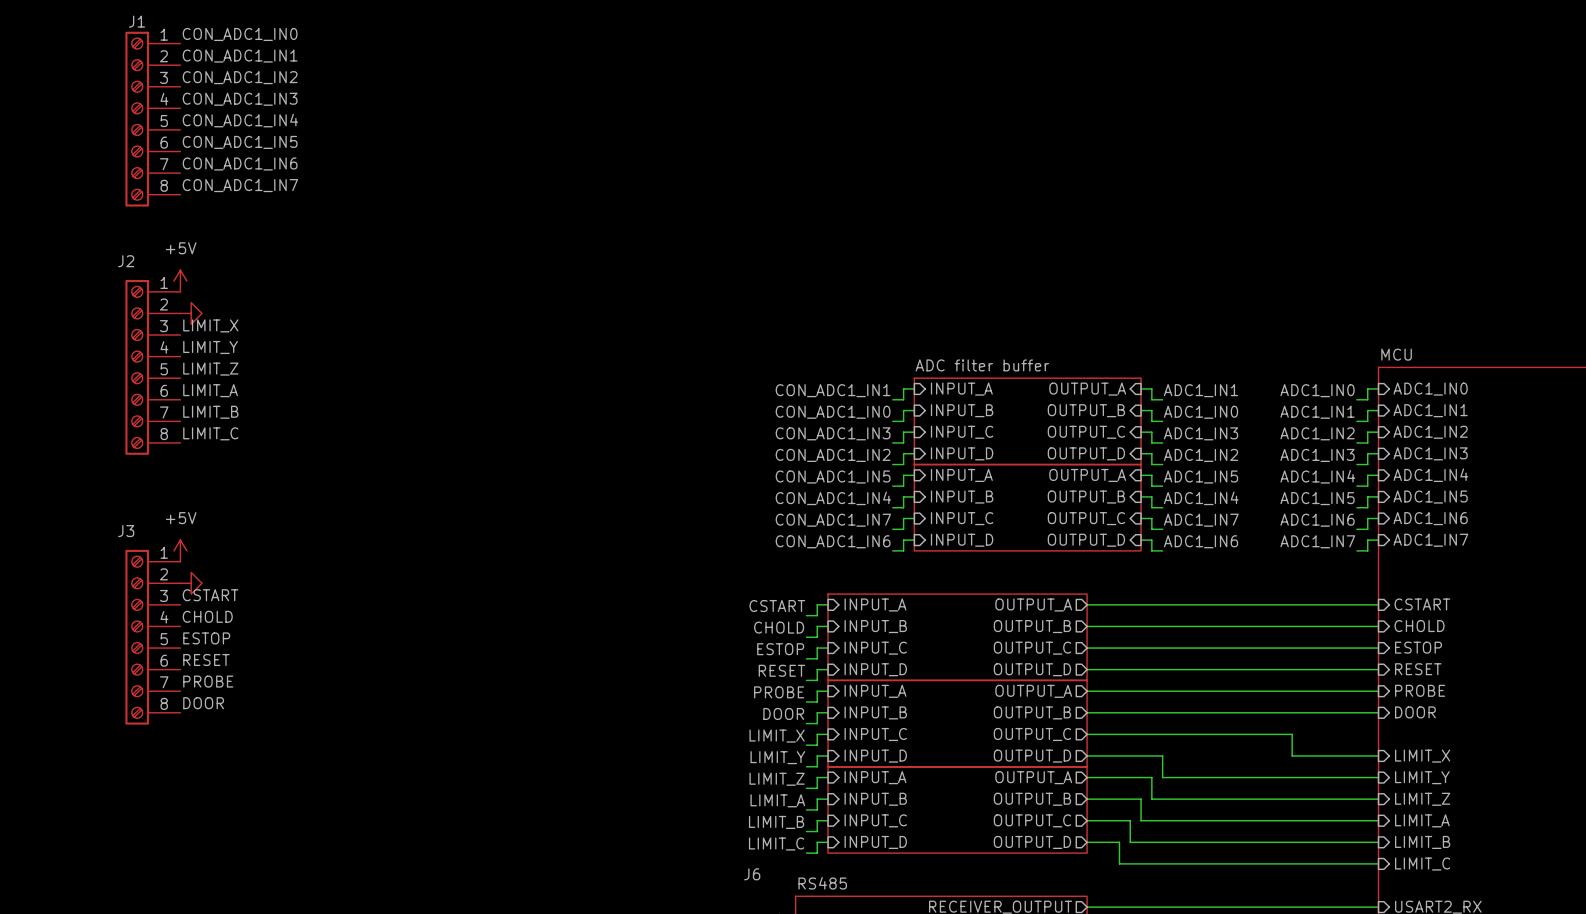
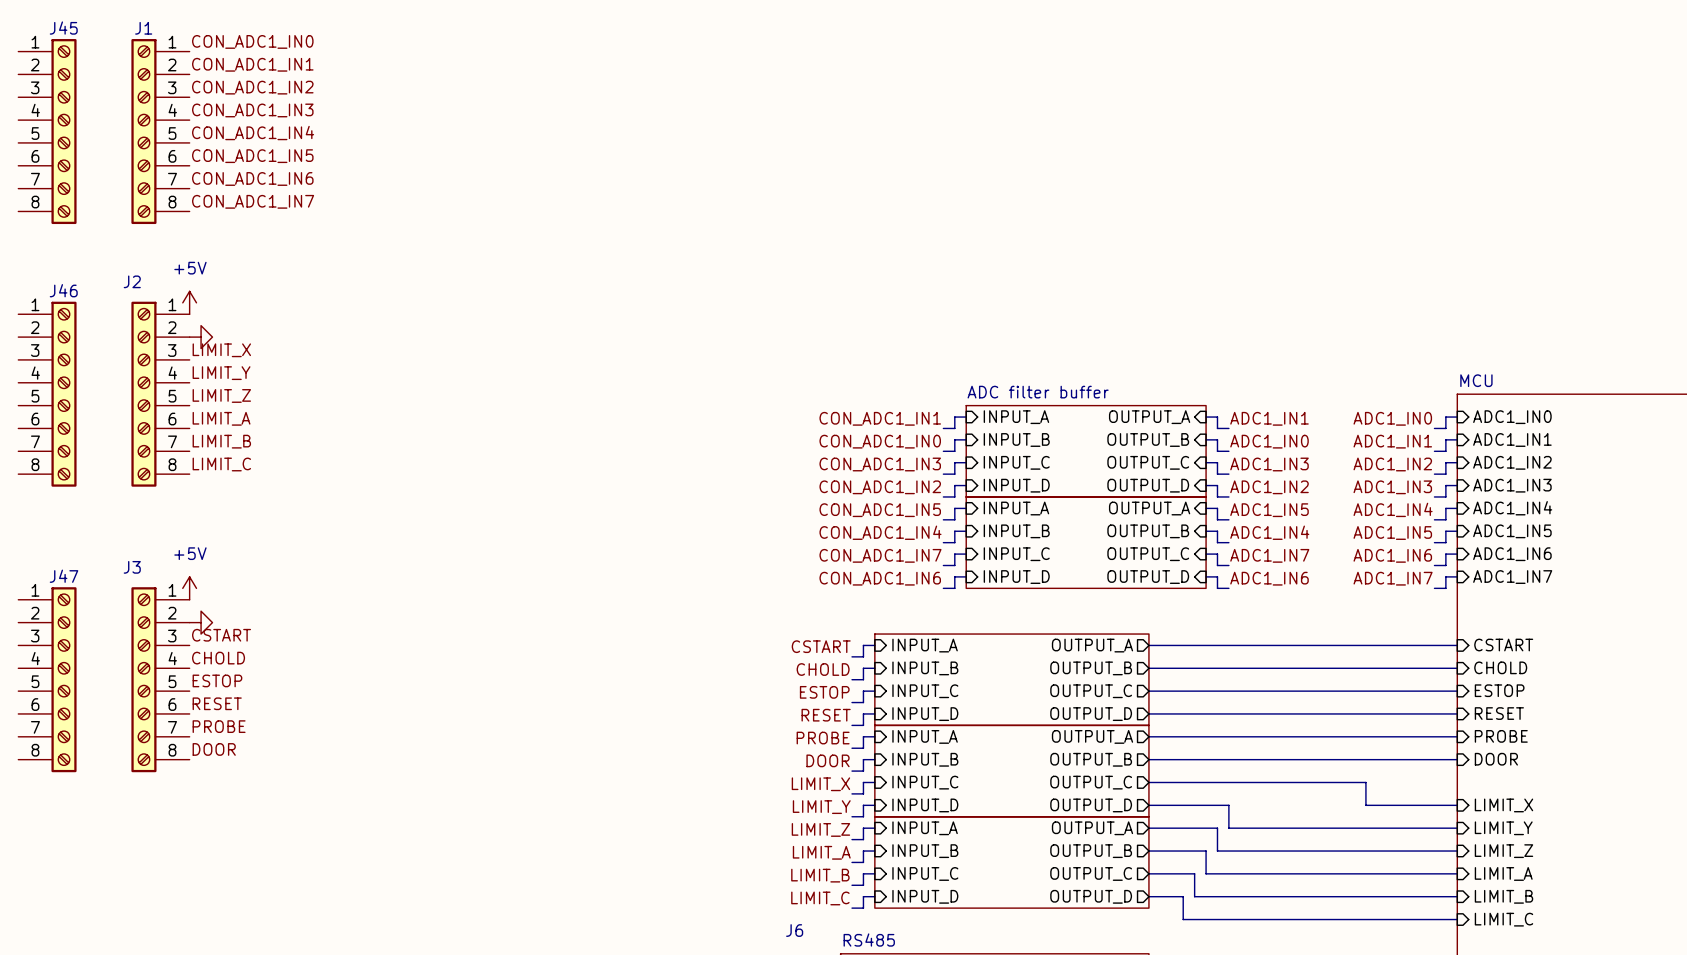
J45: none -> (47, 131)
J46: none -> (47, 394)
J47: none -> (47, 679)

